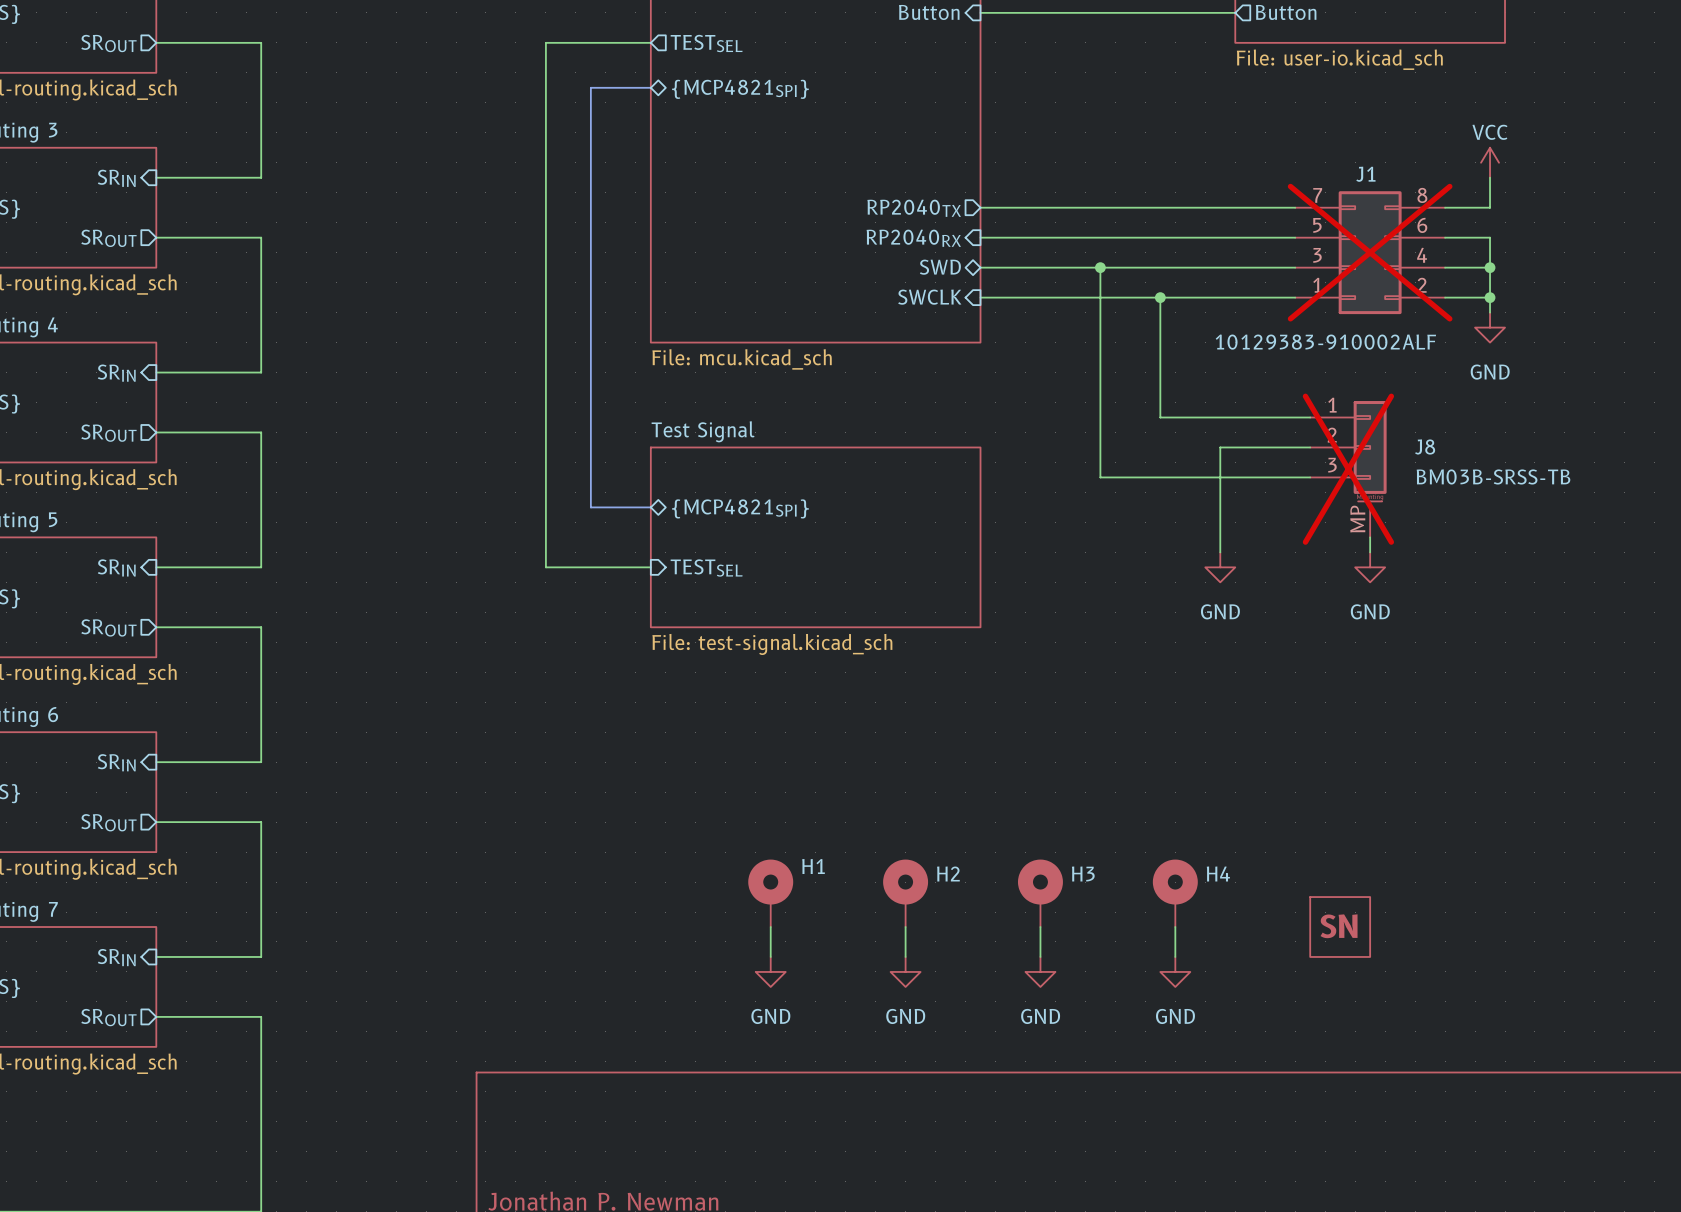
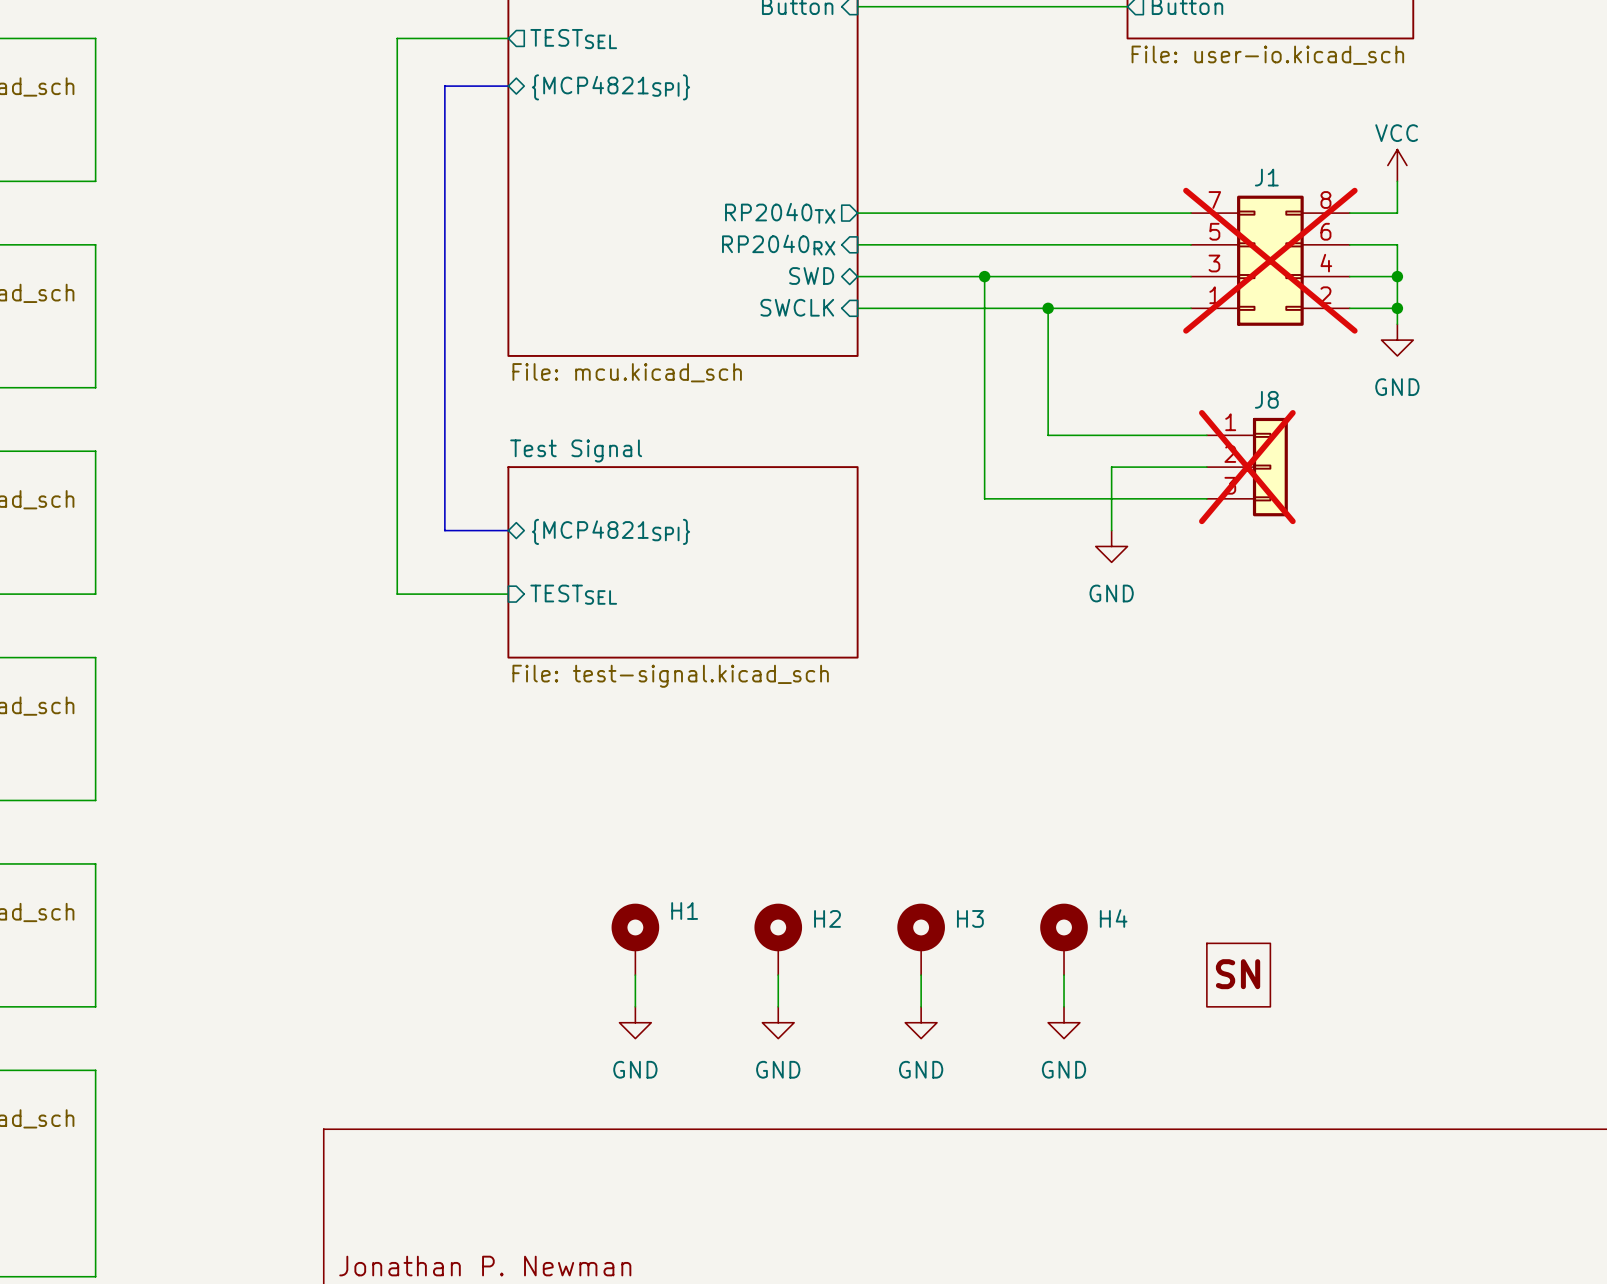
J1 value: 10129383-910002ALF (1325, 342) -> none
J8 symbol: [1310, 401, 1387, 538] -> [1206, 417, 1288, 517]
J8 name position: J8 (1425, 446) -> J8 (1266, 399)
J8 value: BM03B-SRSS-TB (1493, 476) -> none
wire: (1220, 507) (1220, 552) -> none
wire: (1370, 537) (1370, 552) -> none
power symbol position: GND (1220, 567) -> GND (1111, 546)
power symbol: GND (1370, 567) -> none

